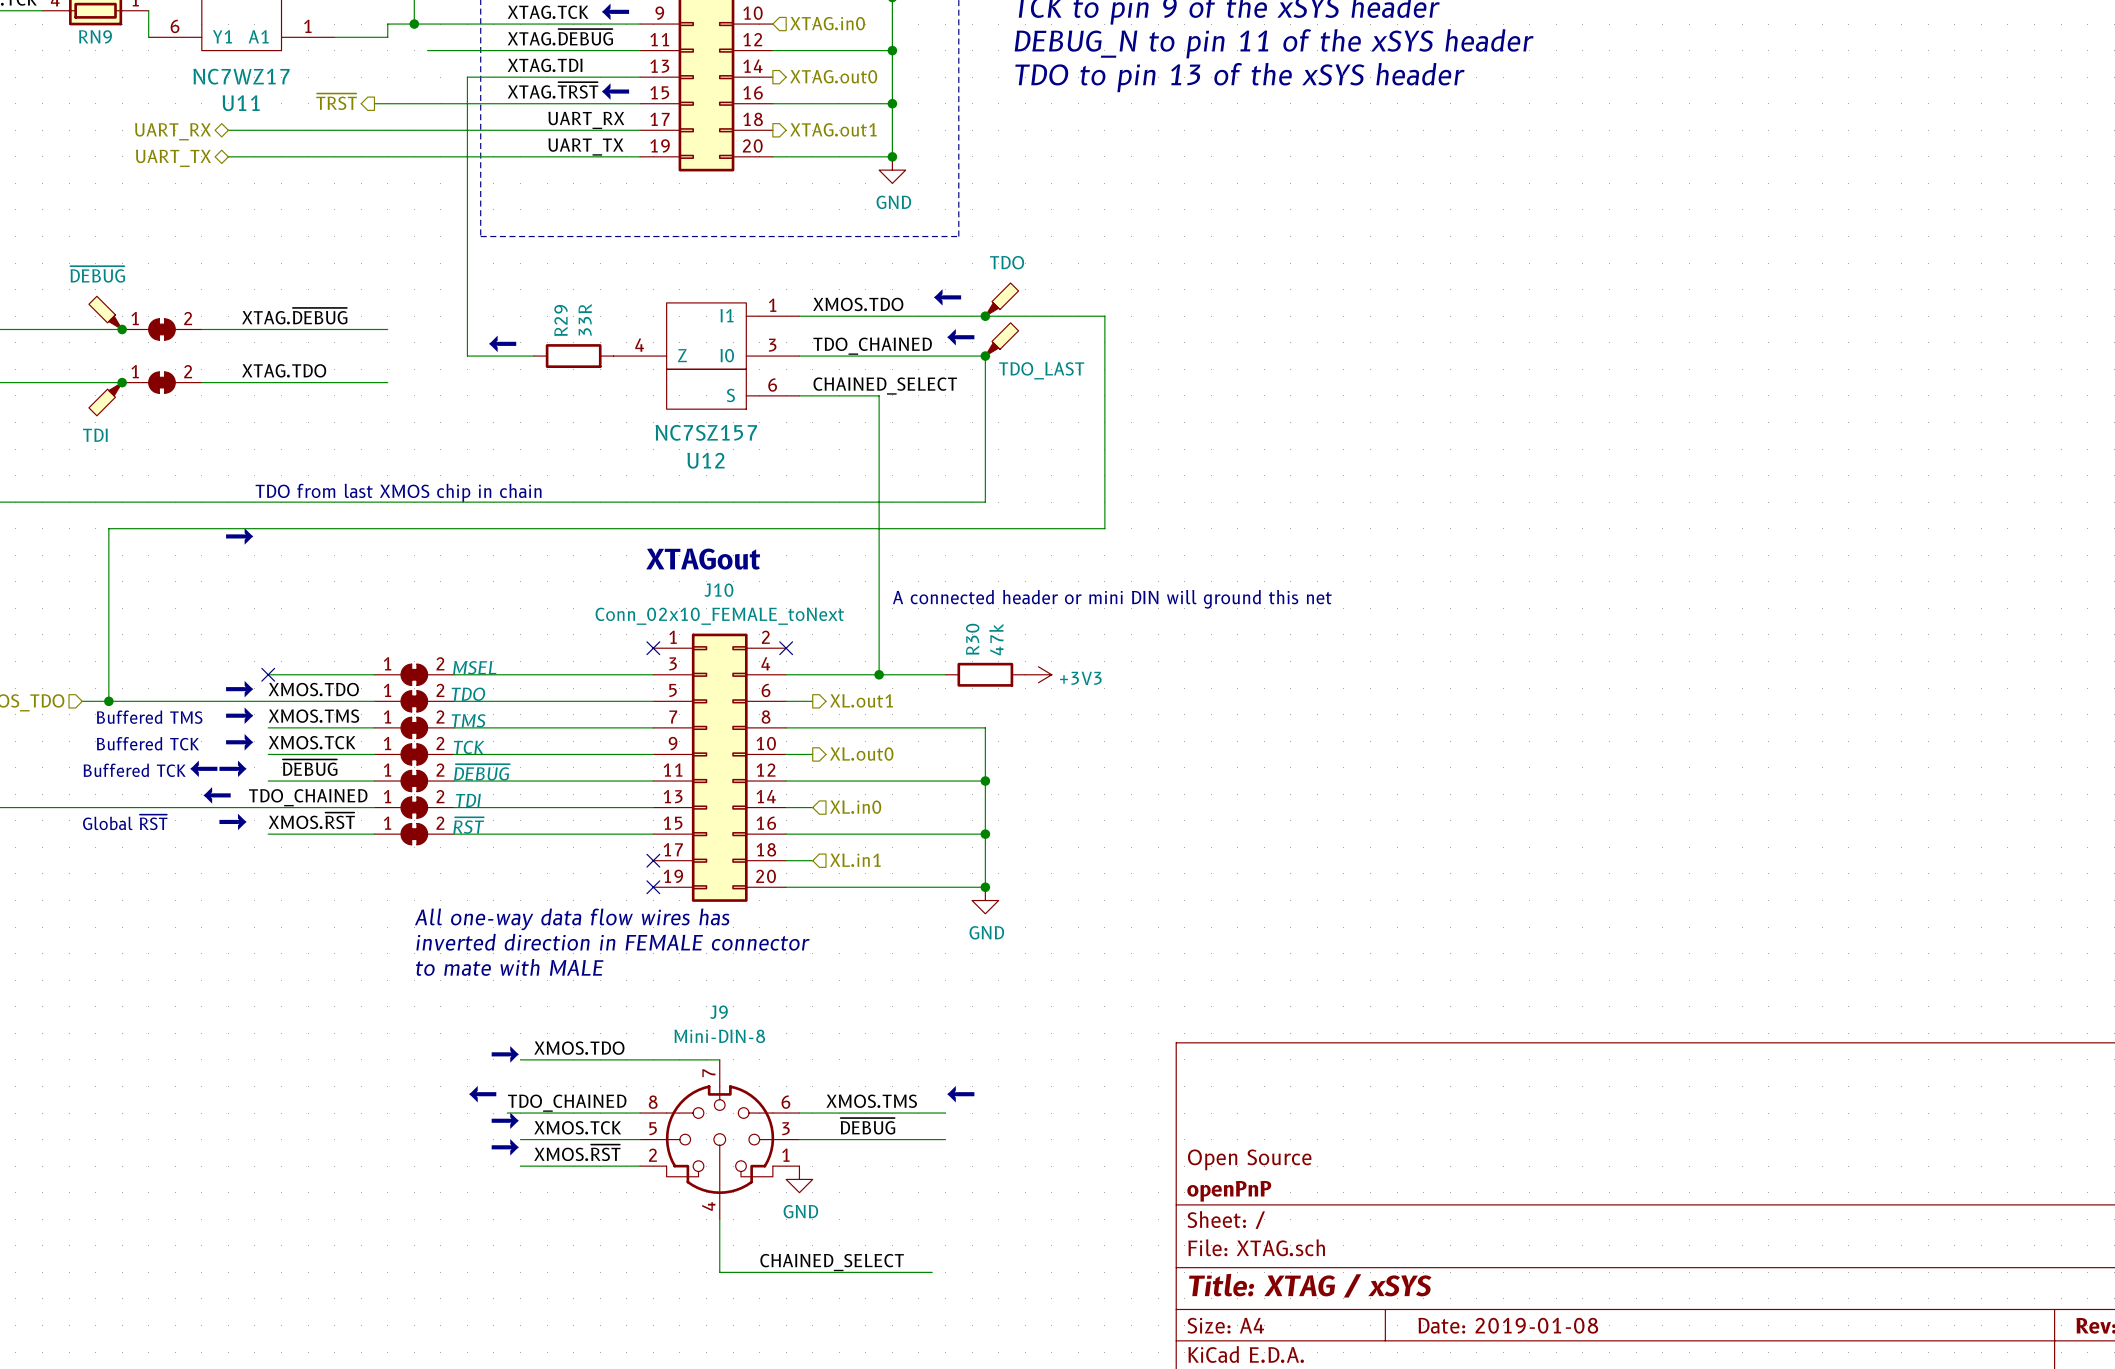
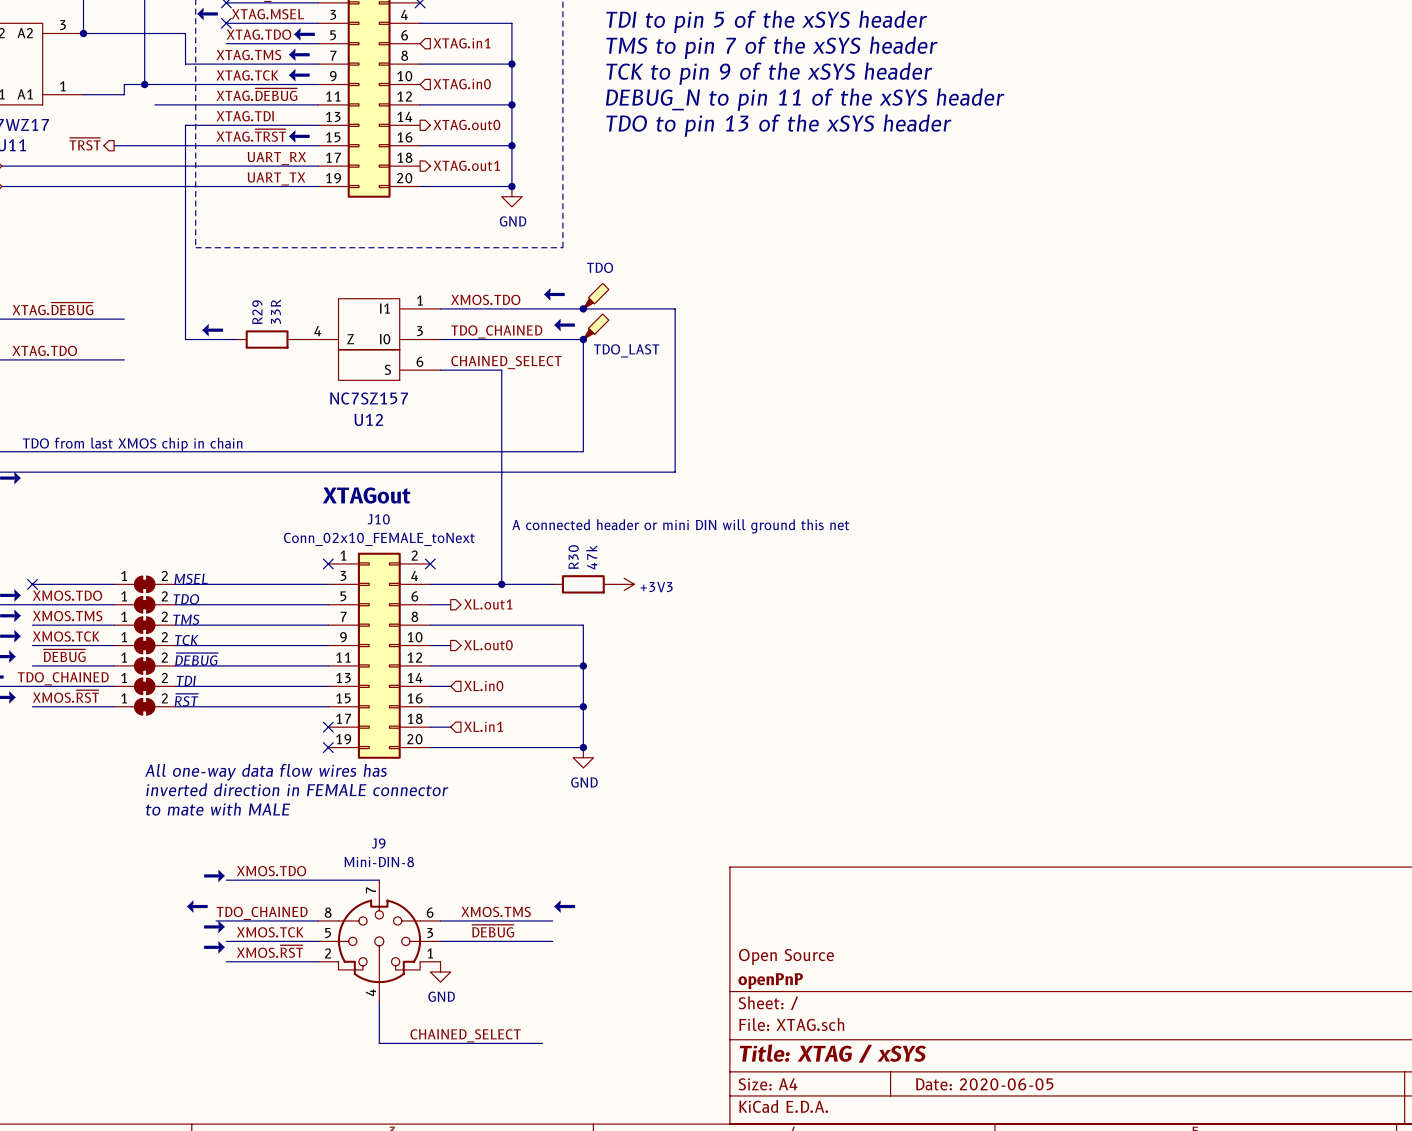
title block: Date: 2019-01-08 (1508, 1325) -> Date: 2020-06-05 (984, 1084)

